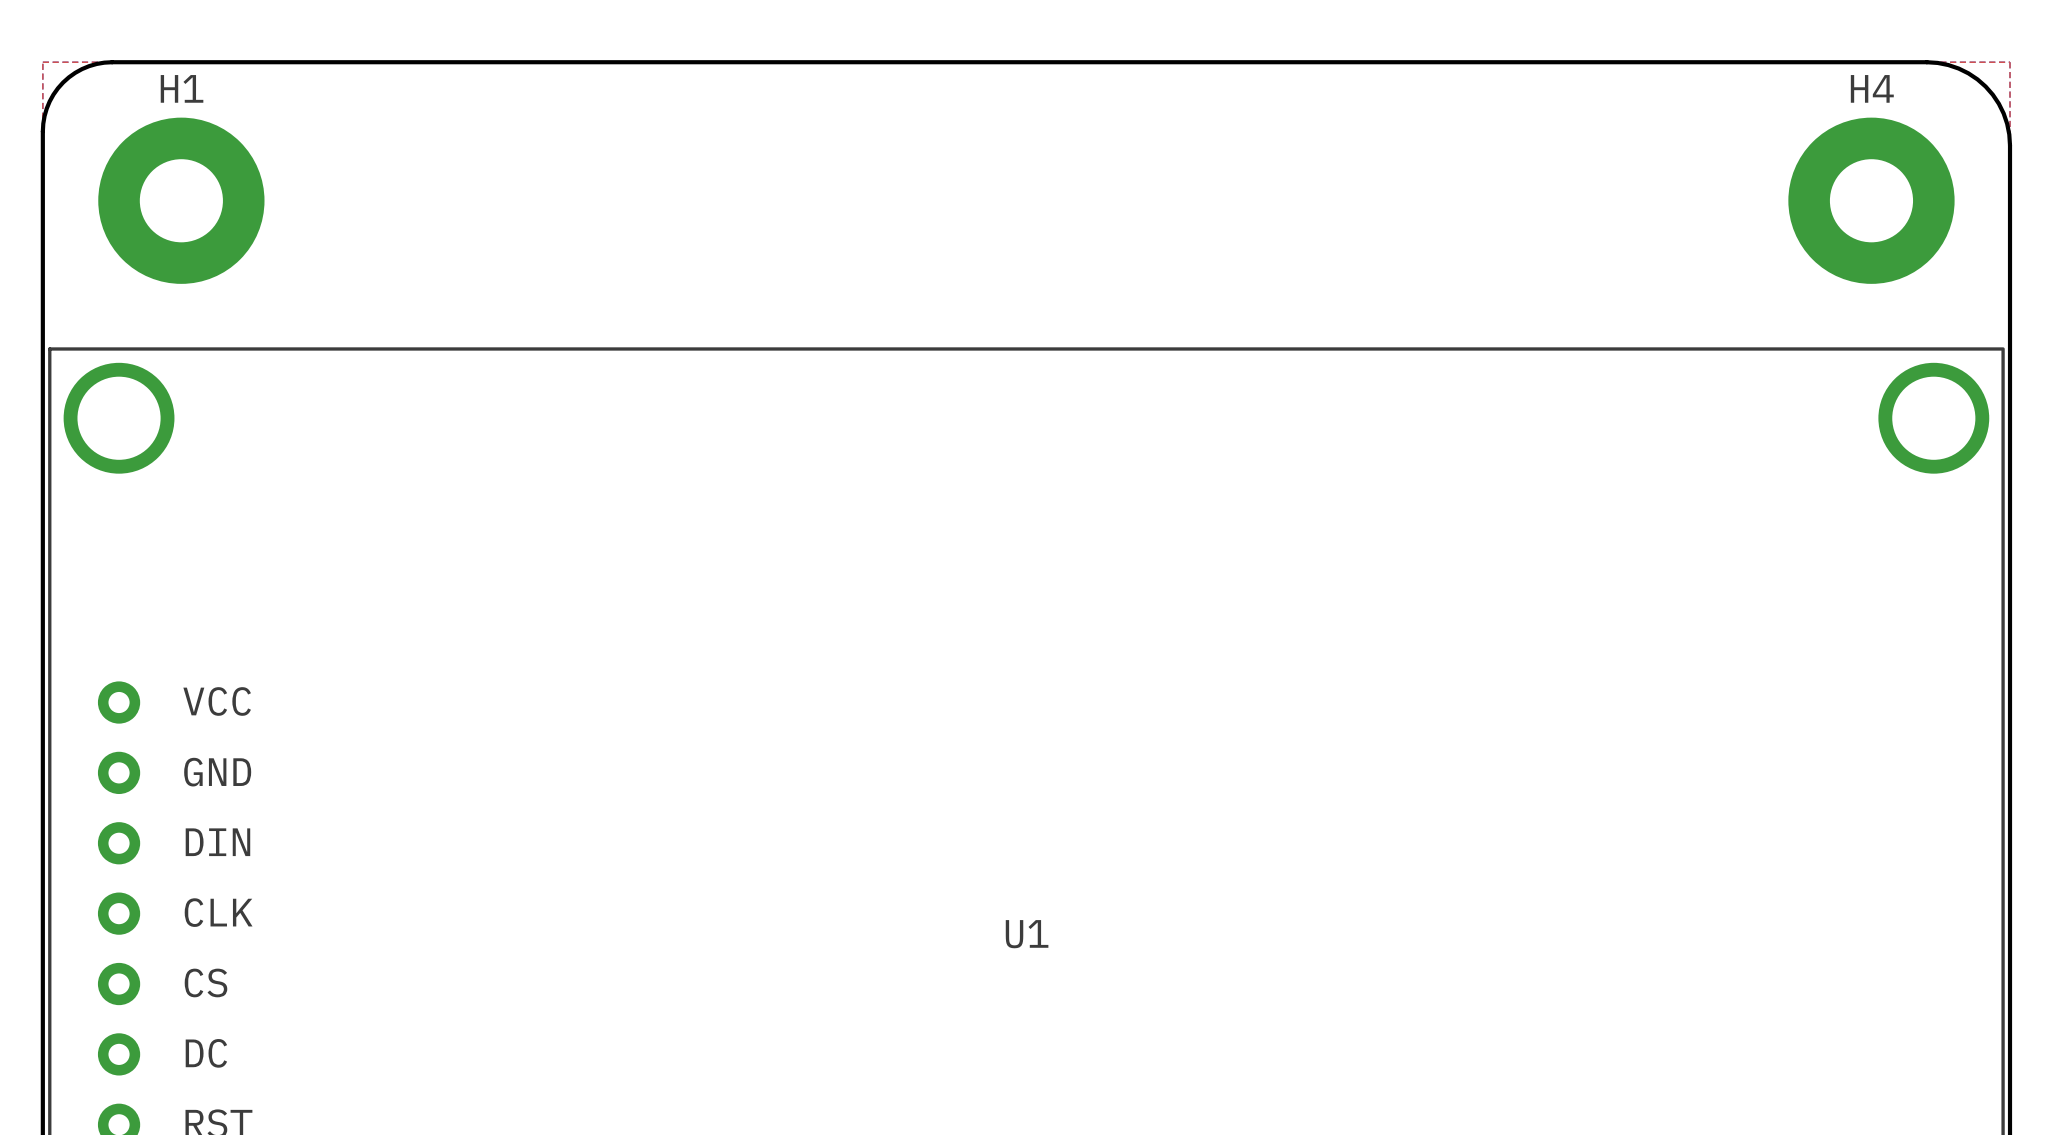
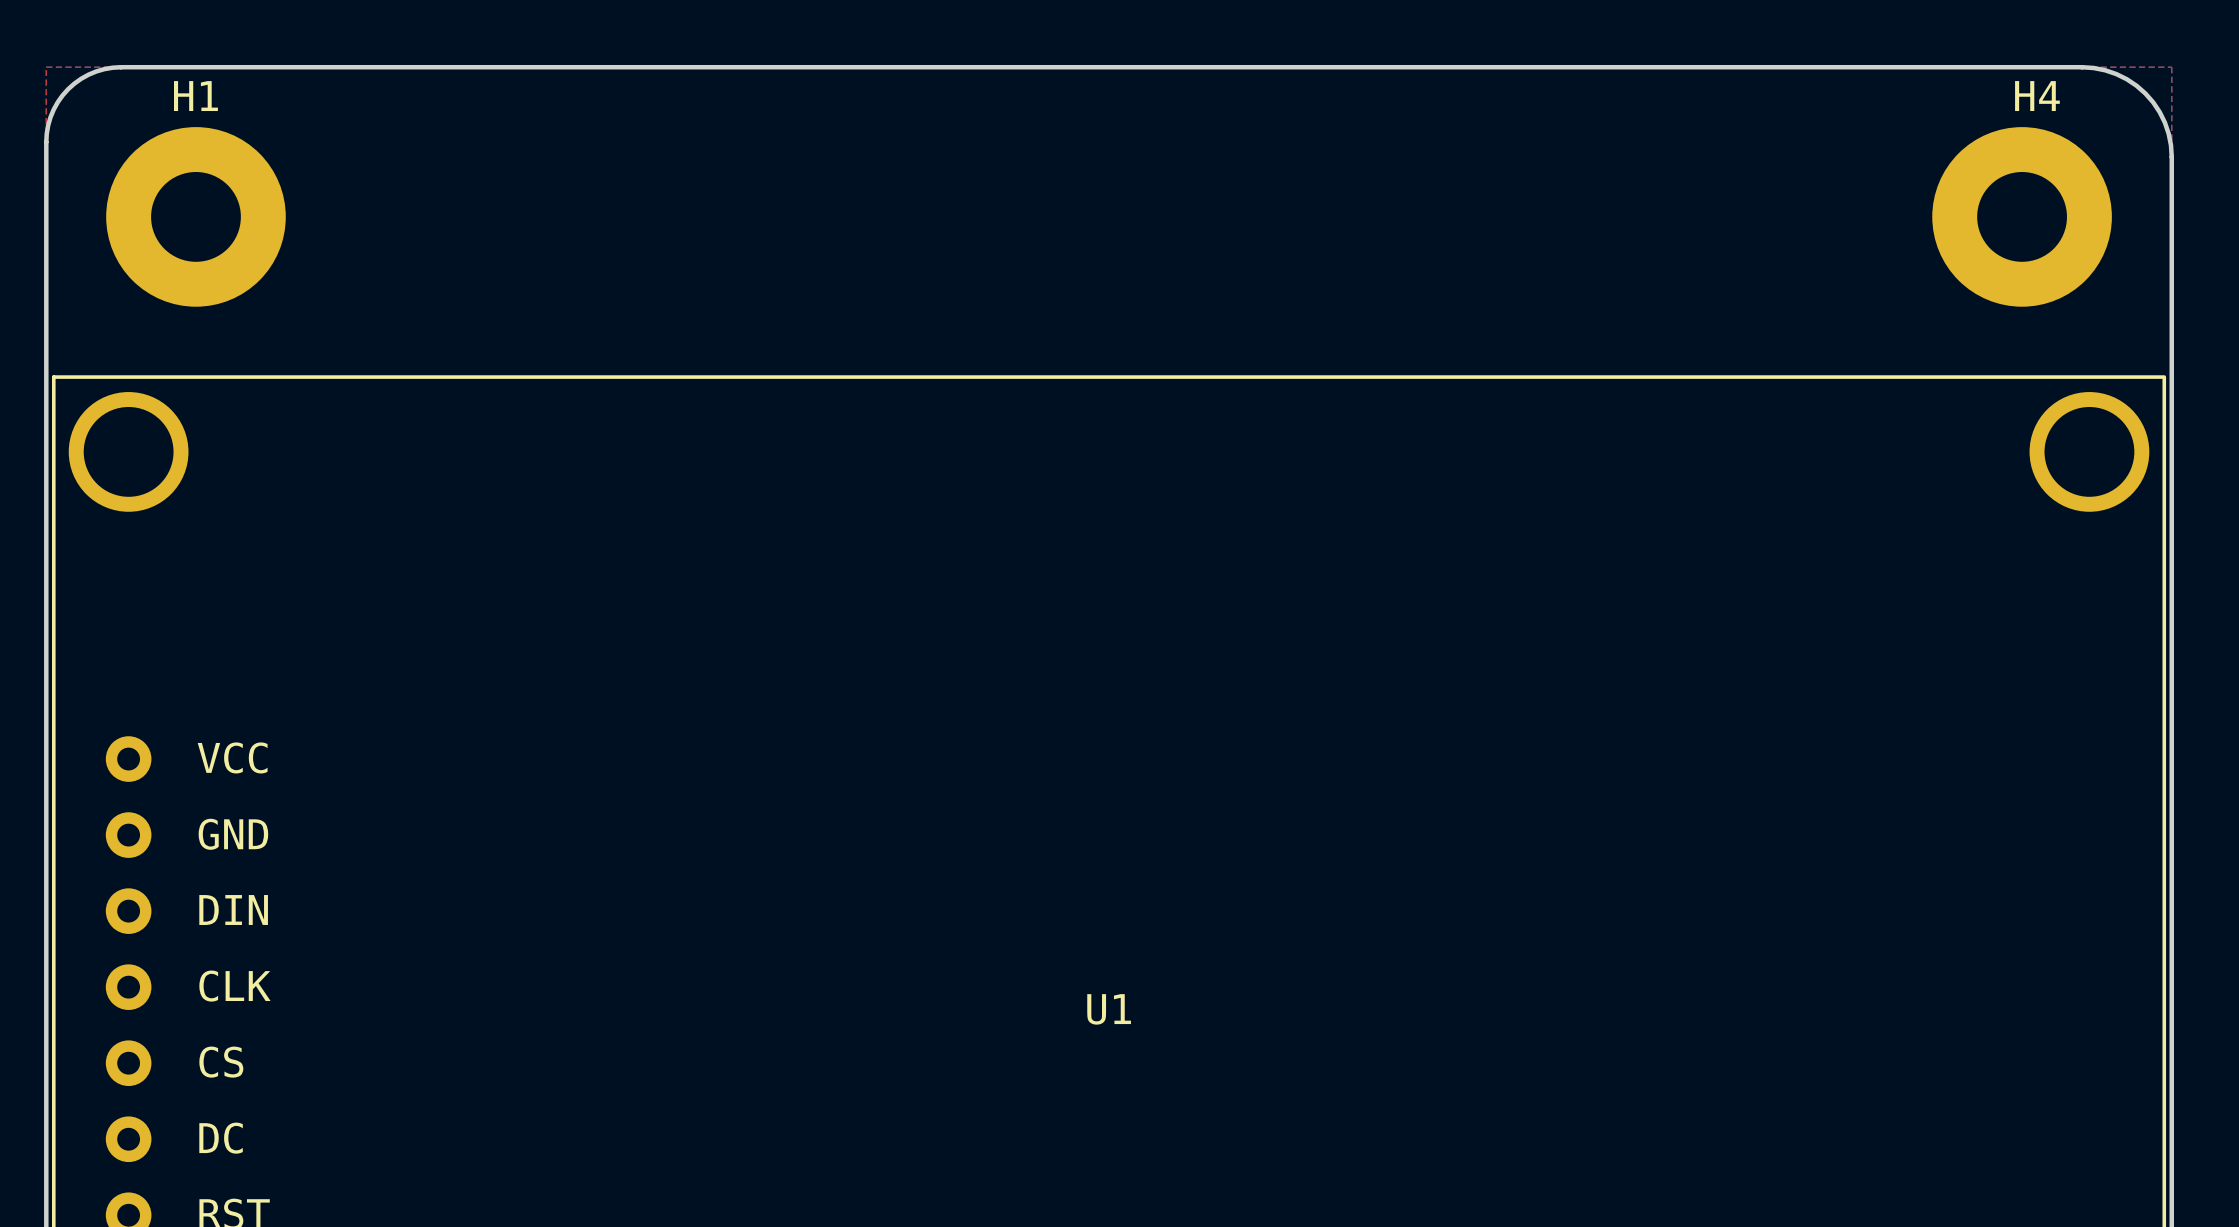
H4 name position: H4 (1872, 88) -> H4 (2037, 96)

